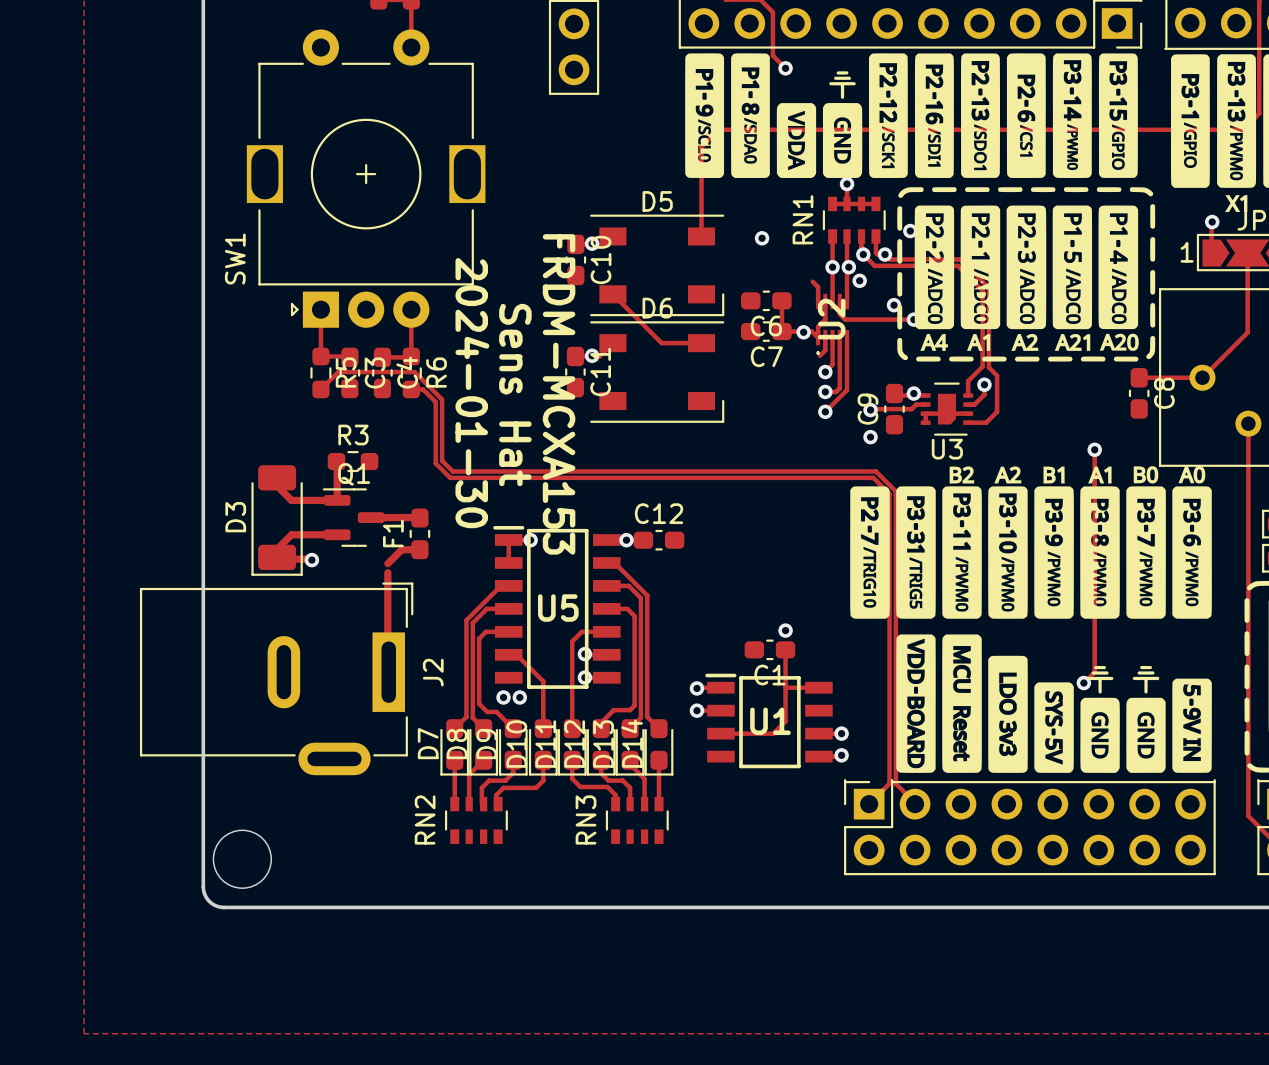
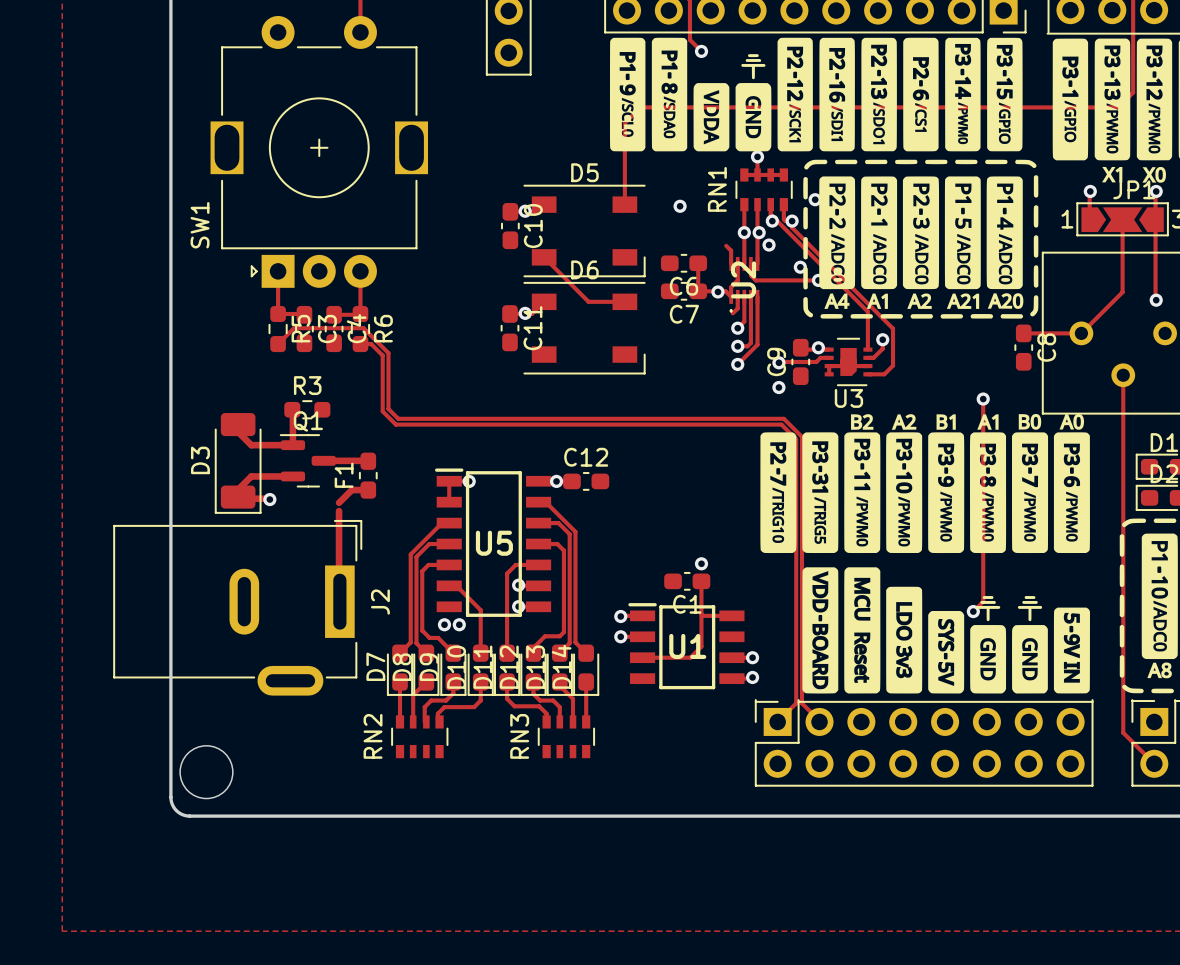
track: (863, 254) (874, 265) (957, 265) (982, 290) (982, 366) (968, 381) -> (772, 221) (777, 221) (867, 311) (867, 336)
track: (885, 254) (889, 259) (960, 259) (988, 287) (988, 367) (997, 375) (995, 413) -> (792, 221) (792, 227) (893, 328) (893, 365)
text: 2024-01-30 (472, 393) -> none
text: FRDM-MCXA153 (559, 394) -> none
text: Sens Hat (515, 395) -> none

